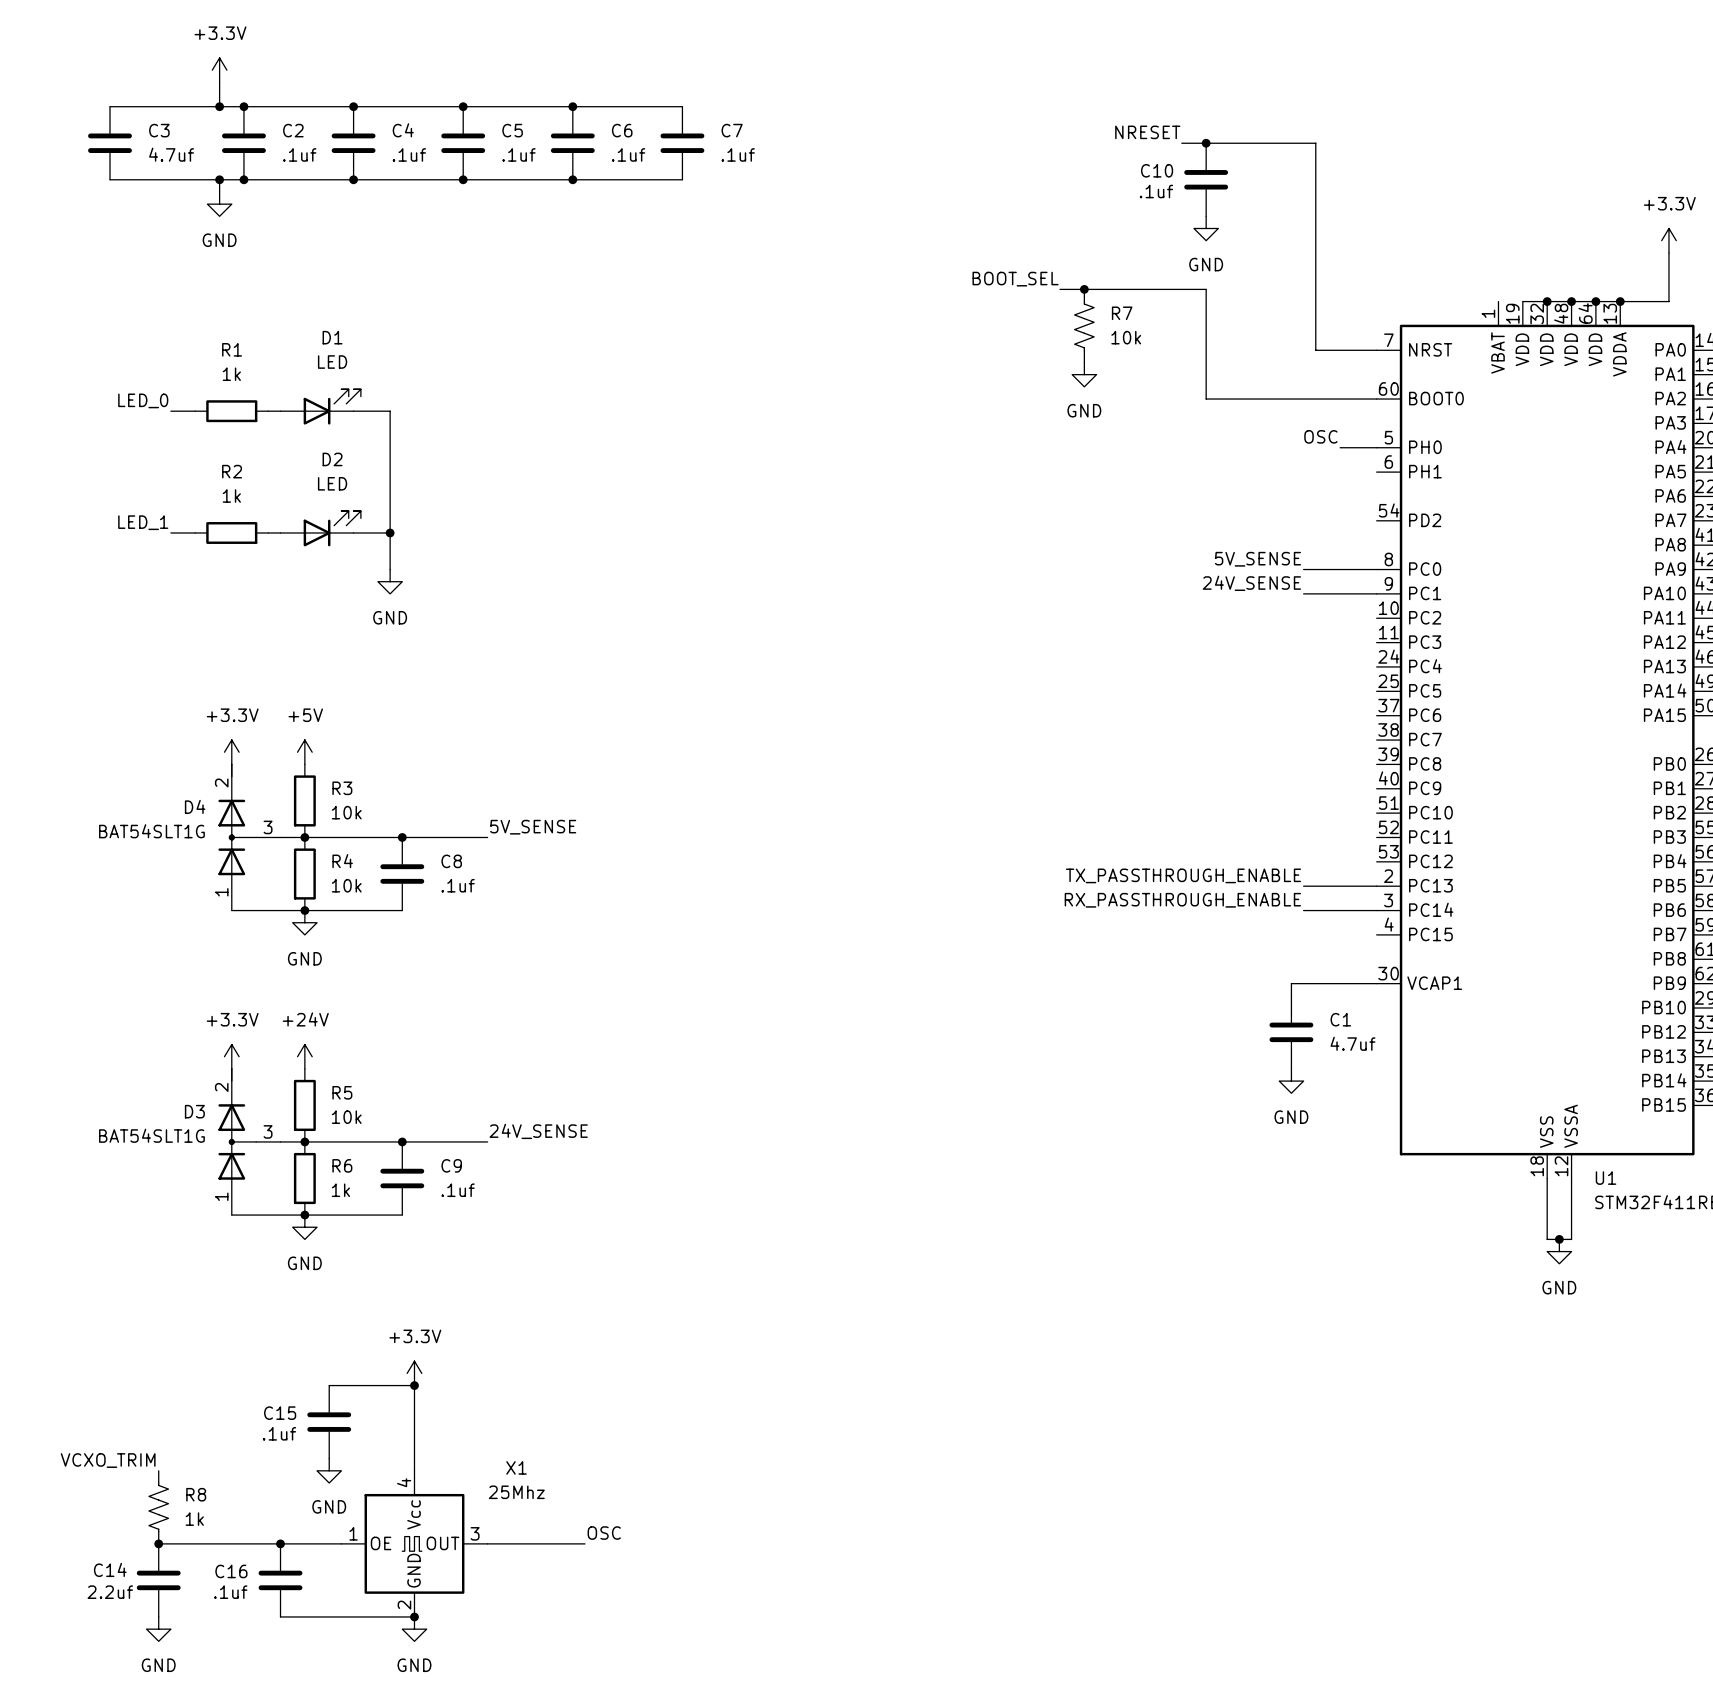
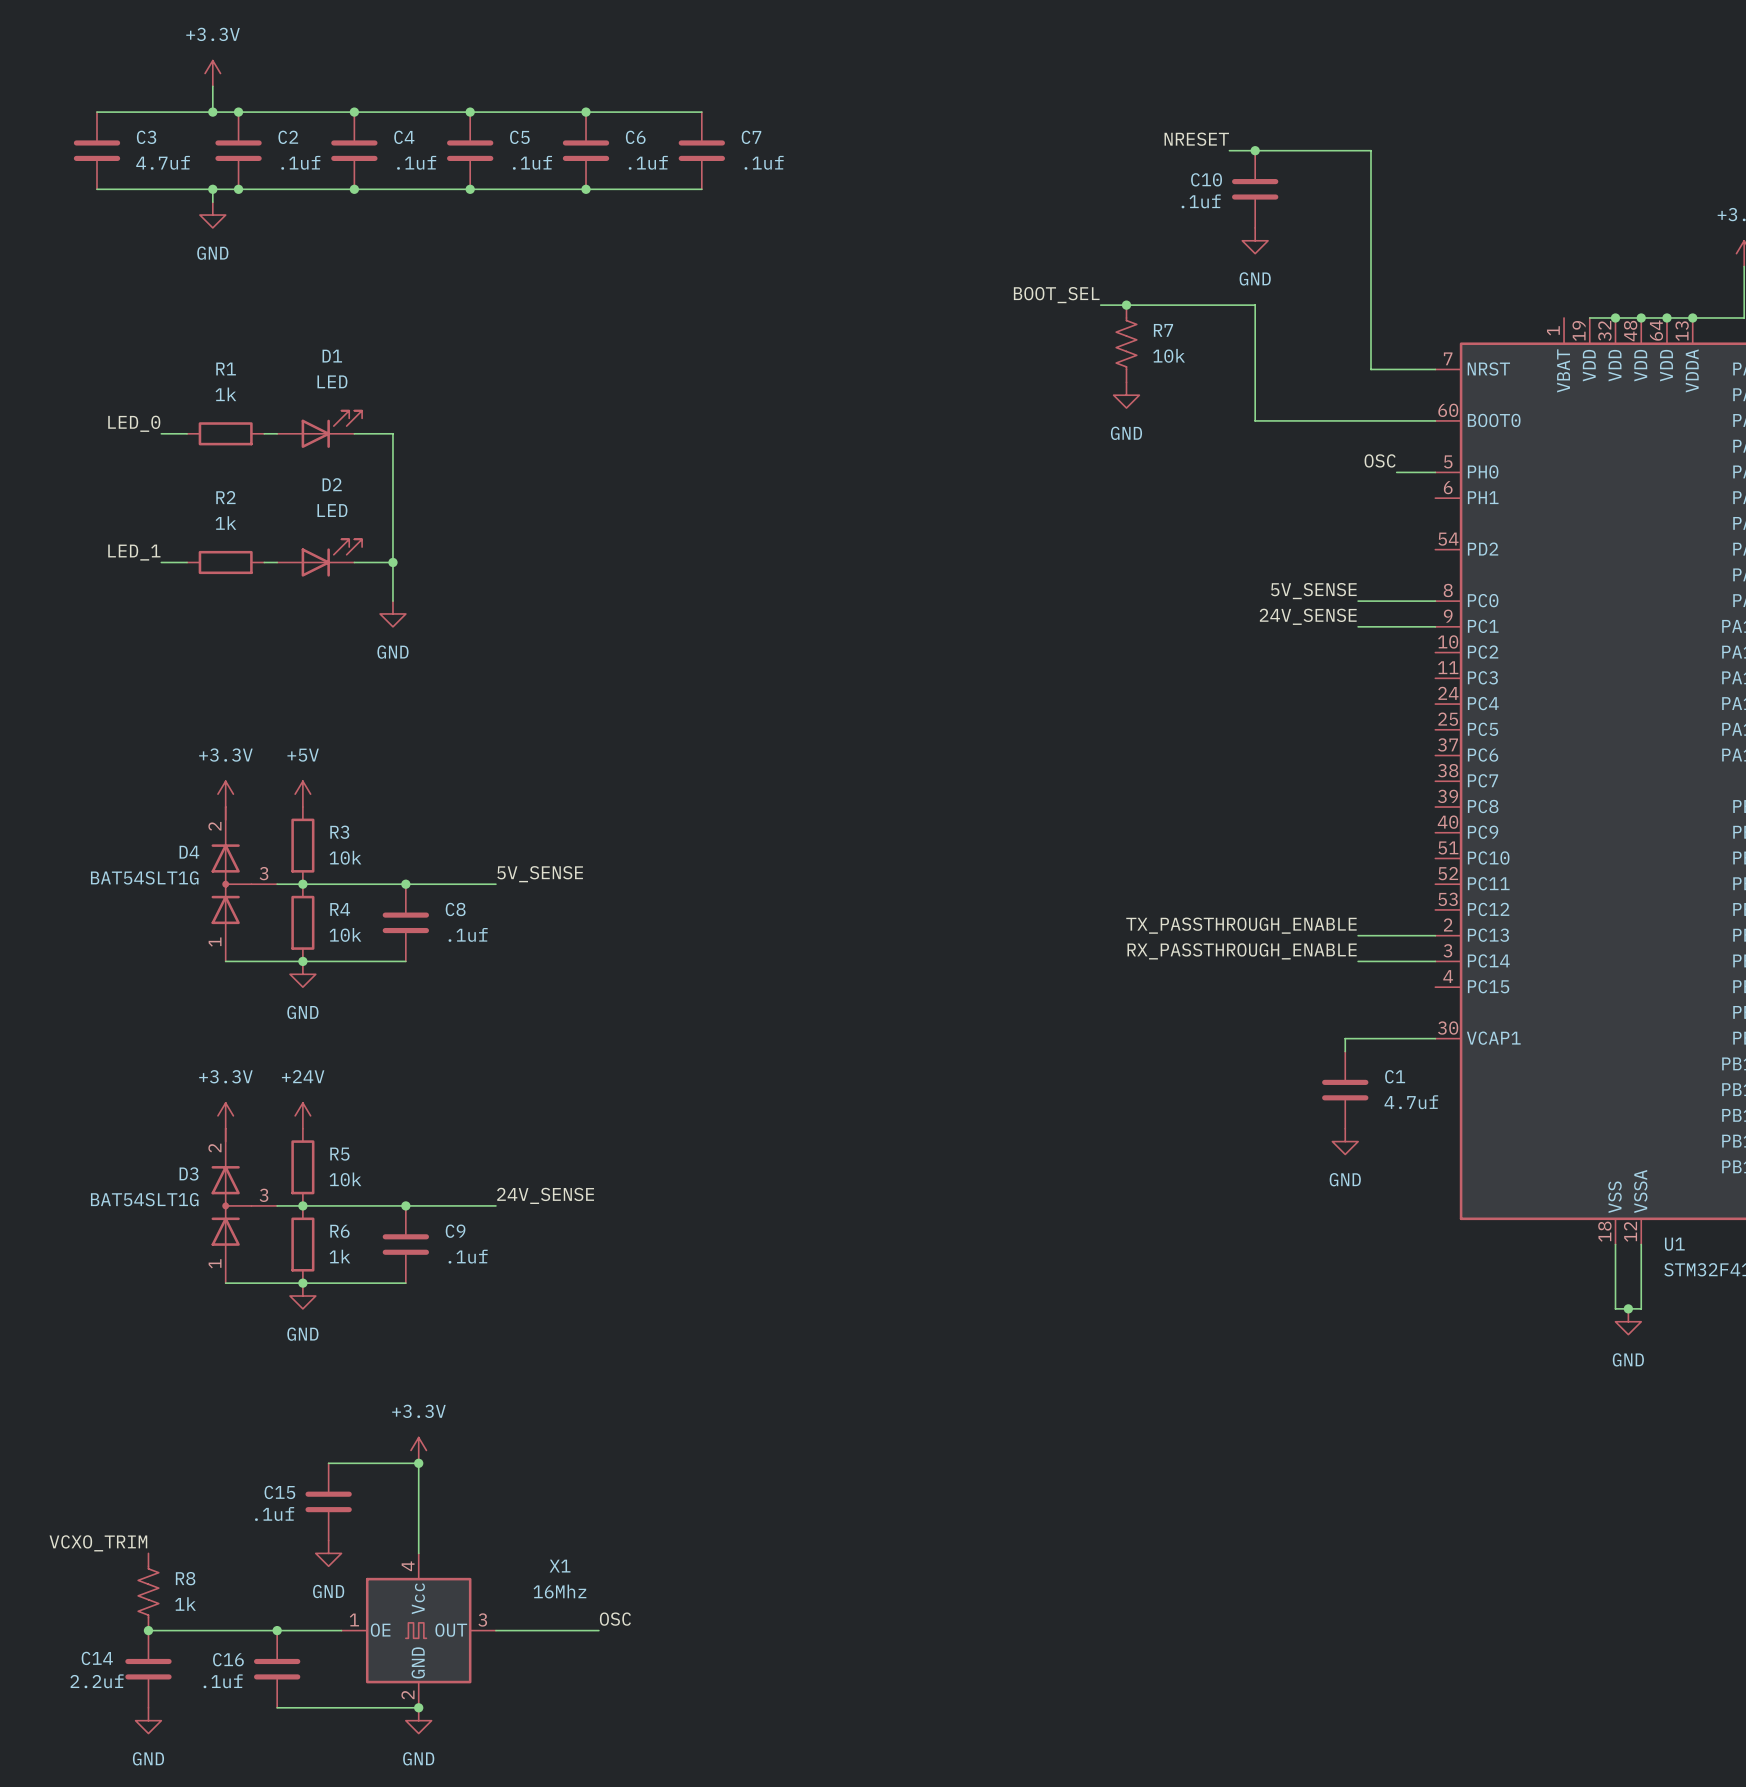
X1 name position: X1 (516, 1467) -> X1 (560, 1566)
X1 value: 25Mhz (516, 1492) -> 16Mhz (559, 1591)

